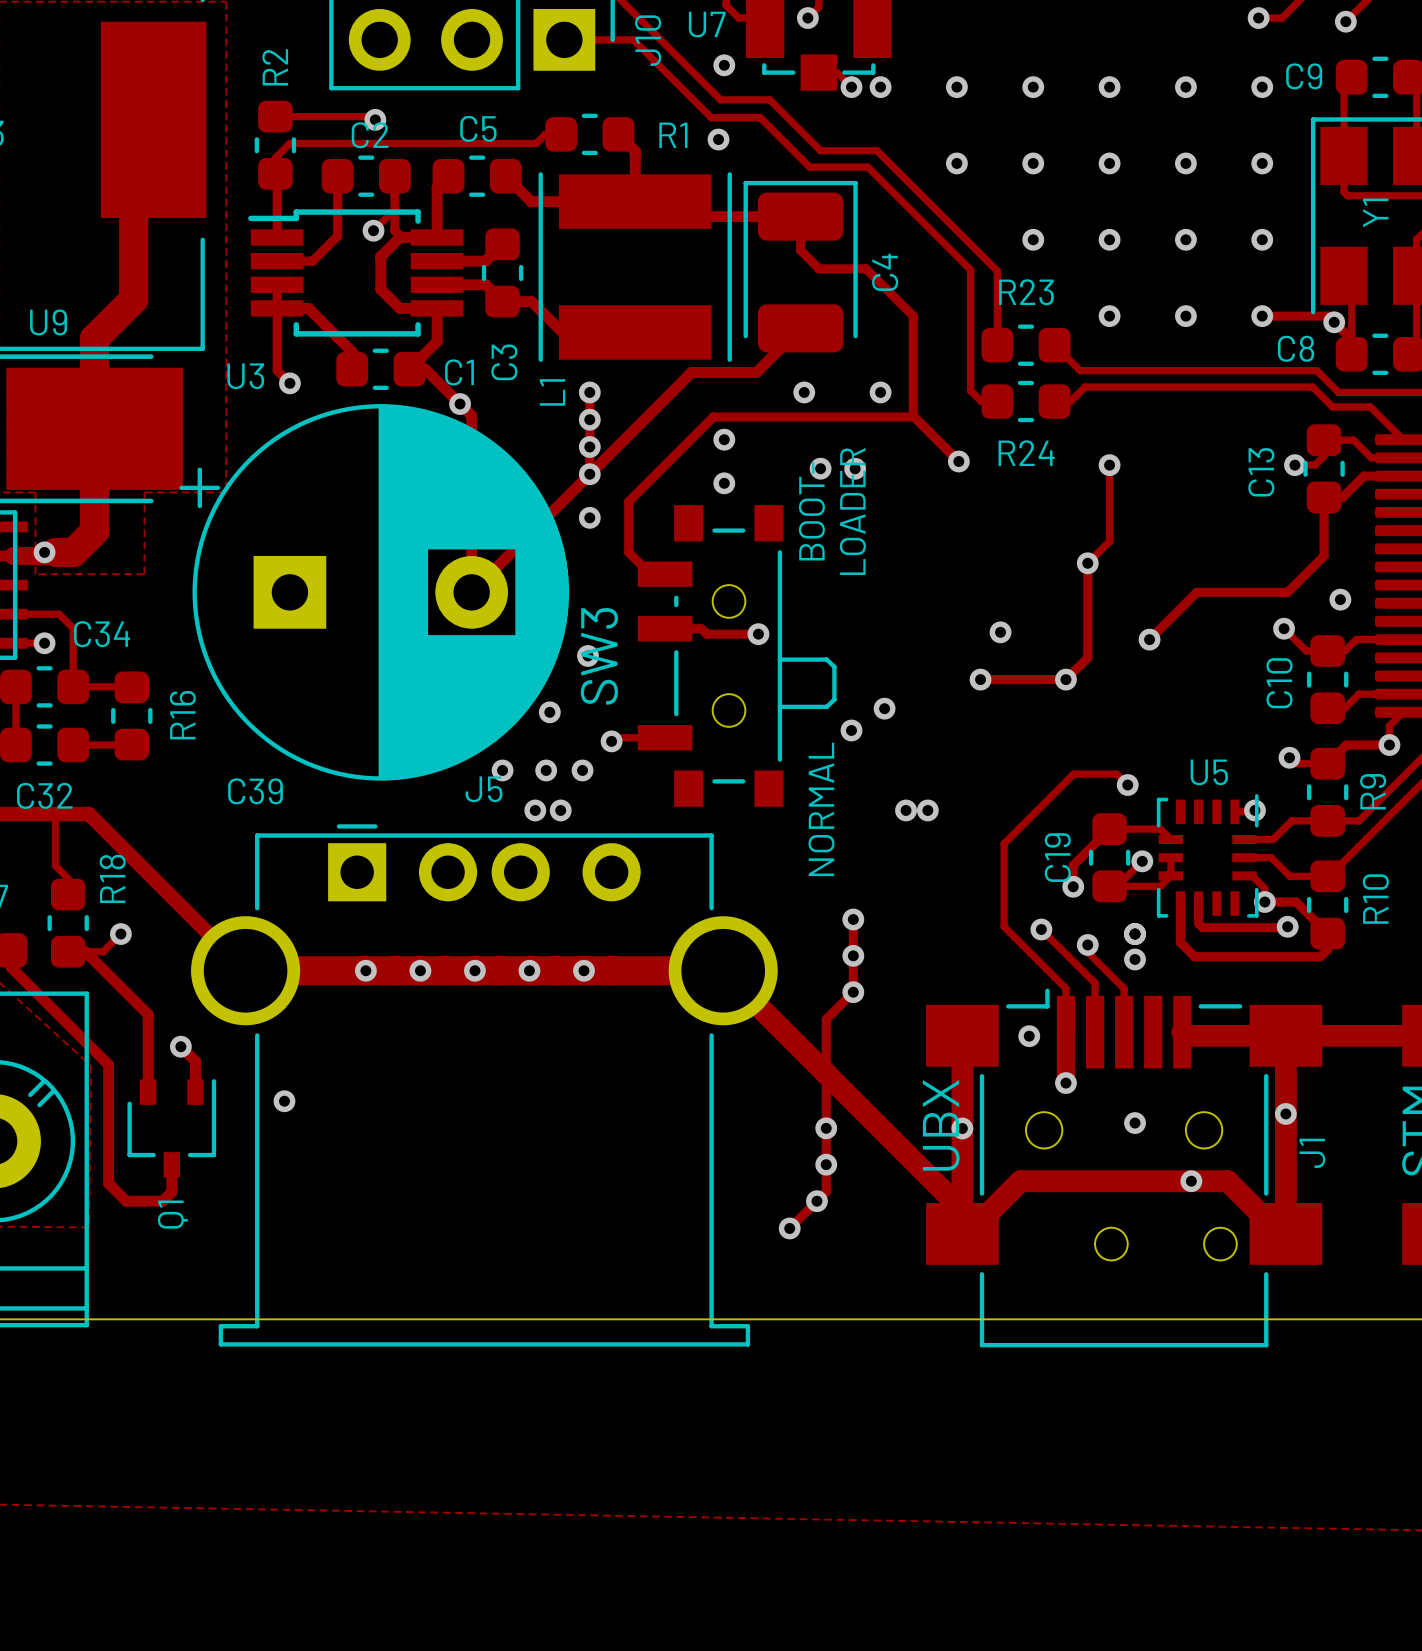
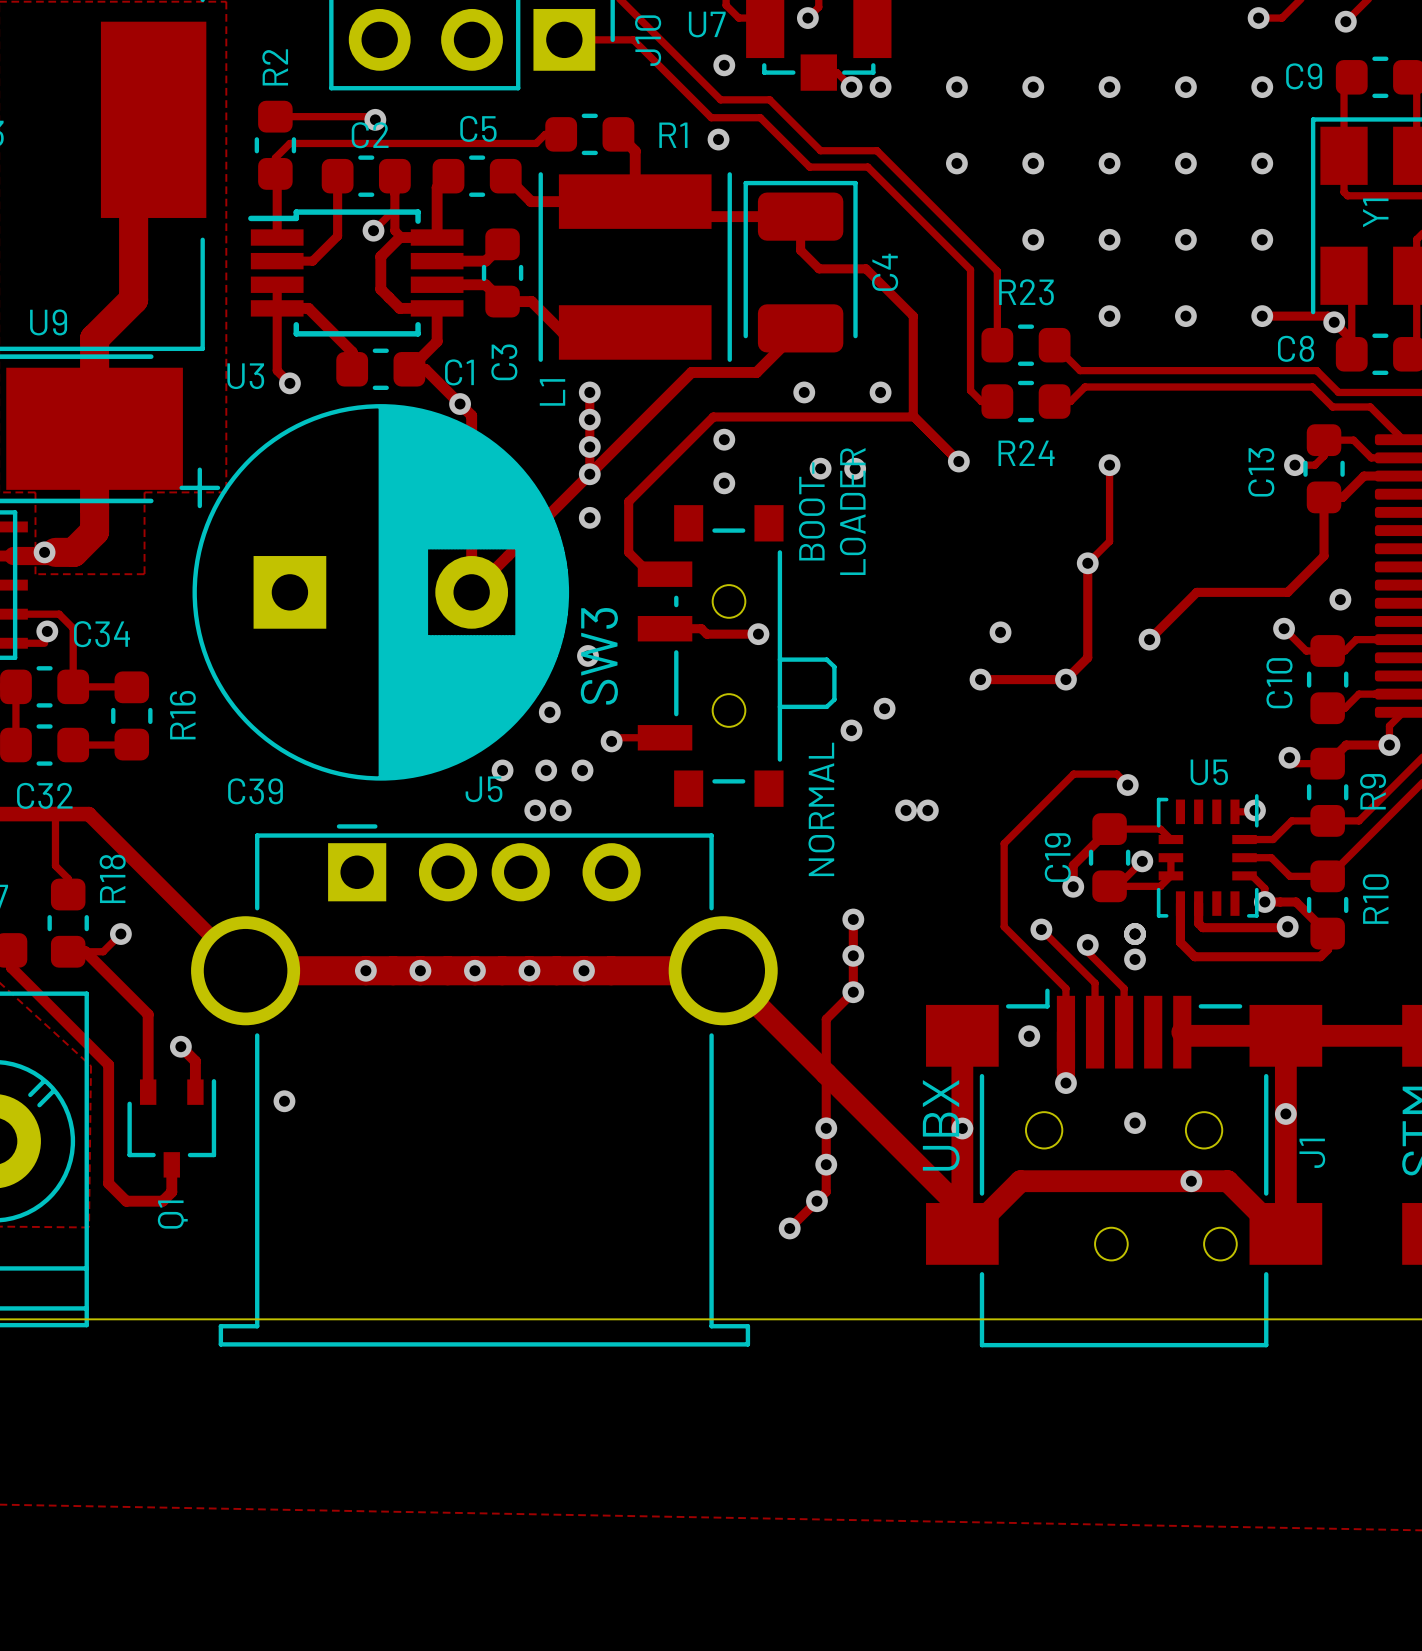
via position: (44, 643) -> (47, 631)

